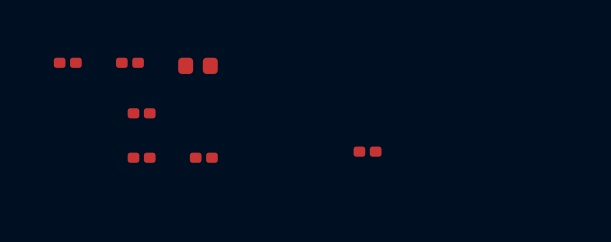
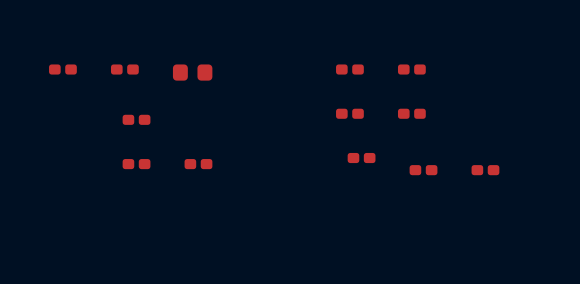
part: none -> (349, 69)
part: none -> (411, 69)
part: none -> (349, 113)
part: none -> (411, 113)
part: none -> (423, 170)
part: none -> (485, 170)

